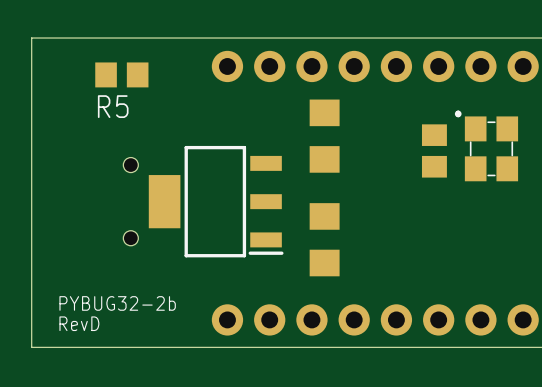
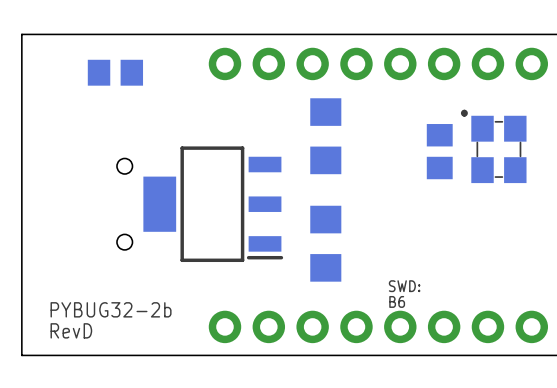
R5 name: R5 (113, 106) -> none
text: none -> SWD: (404, 286)
text: none -> B6 (397, 301)

